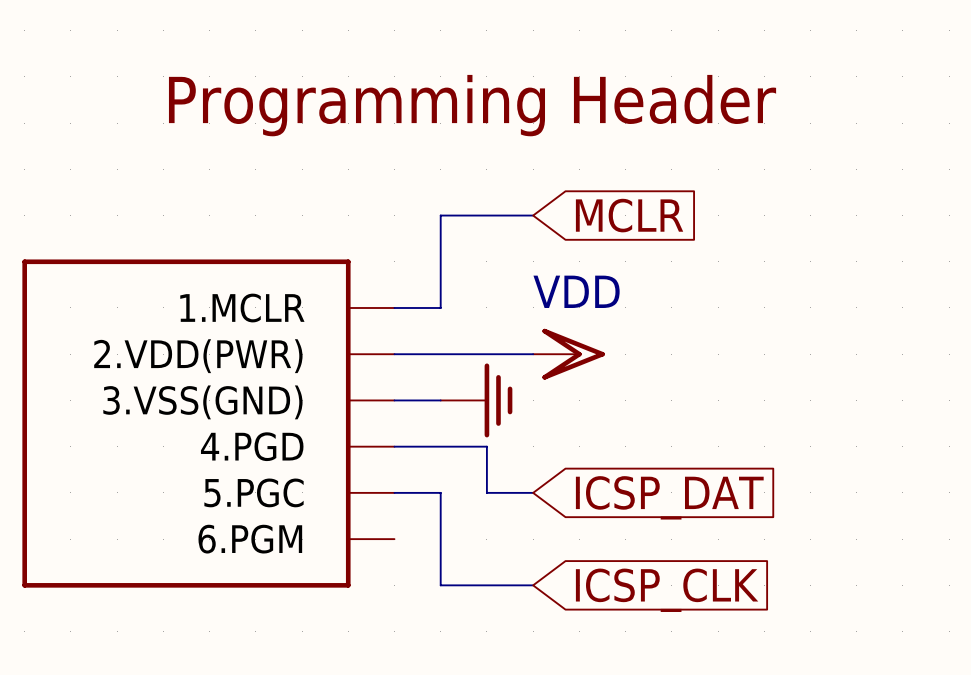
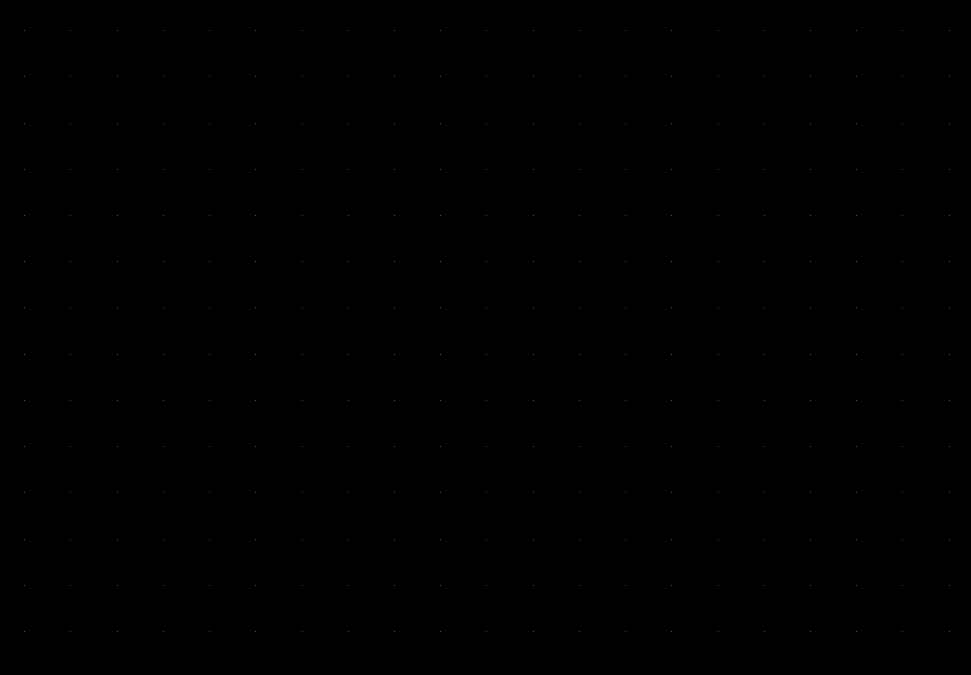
text: Programming Header (472, 105) -> none
wire: (533, 215) (440, 215) (440, 307) (394, 307) -> none
global label: MCLR (629, 215) -> none
wire: (394, 354) (533, 354) -> none
power symbol: VDD (568, 354) -> none
wire: (394, 400) (440, 400) -> none
power symbol: (476, 400) -> none
part: (208, 423) -> none
wire: (394, 446) (486, 446) (486, 492) (533, 492) -> none
wire: (394, 492) (440, 492) (440, 585) (533, 585) -> none
global label: ICSP_DAT (669, 497) -> none
global label: ICSP_CLK (667, 590) -> none

